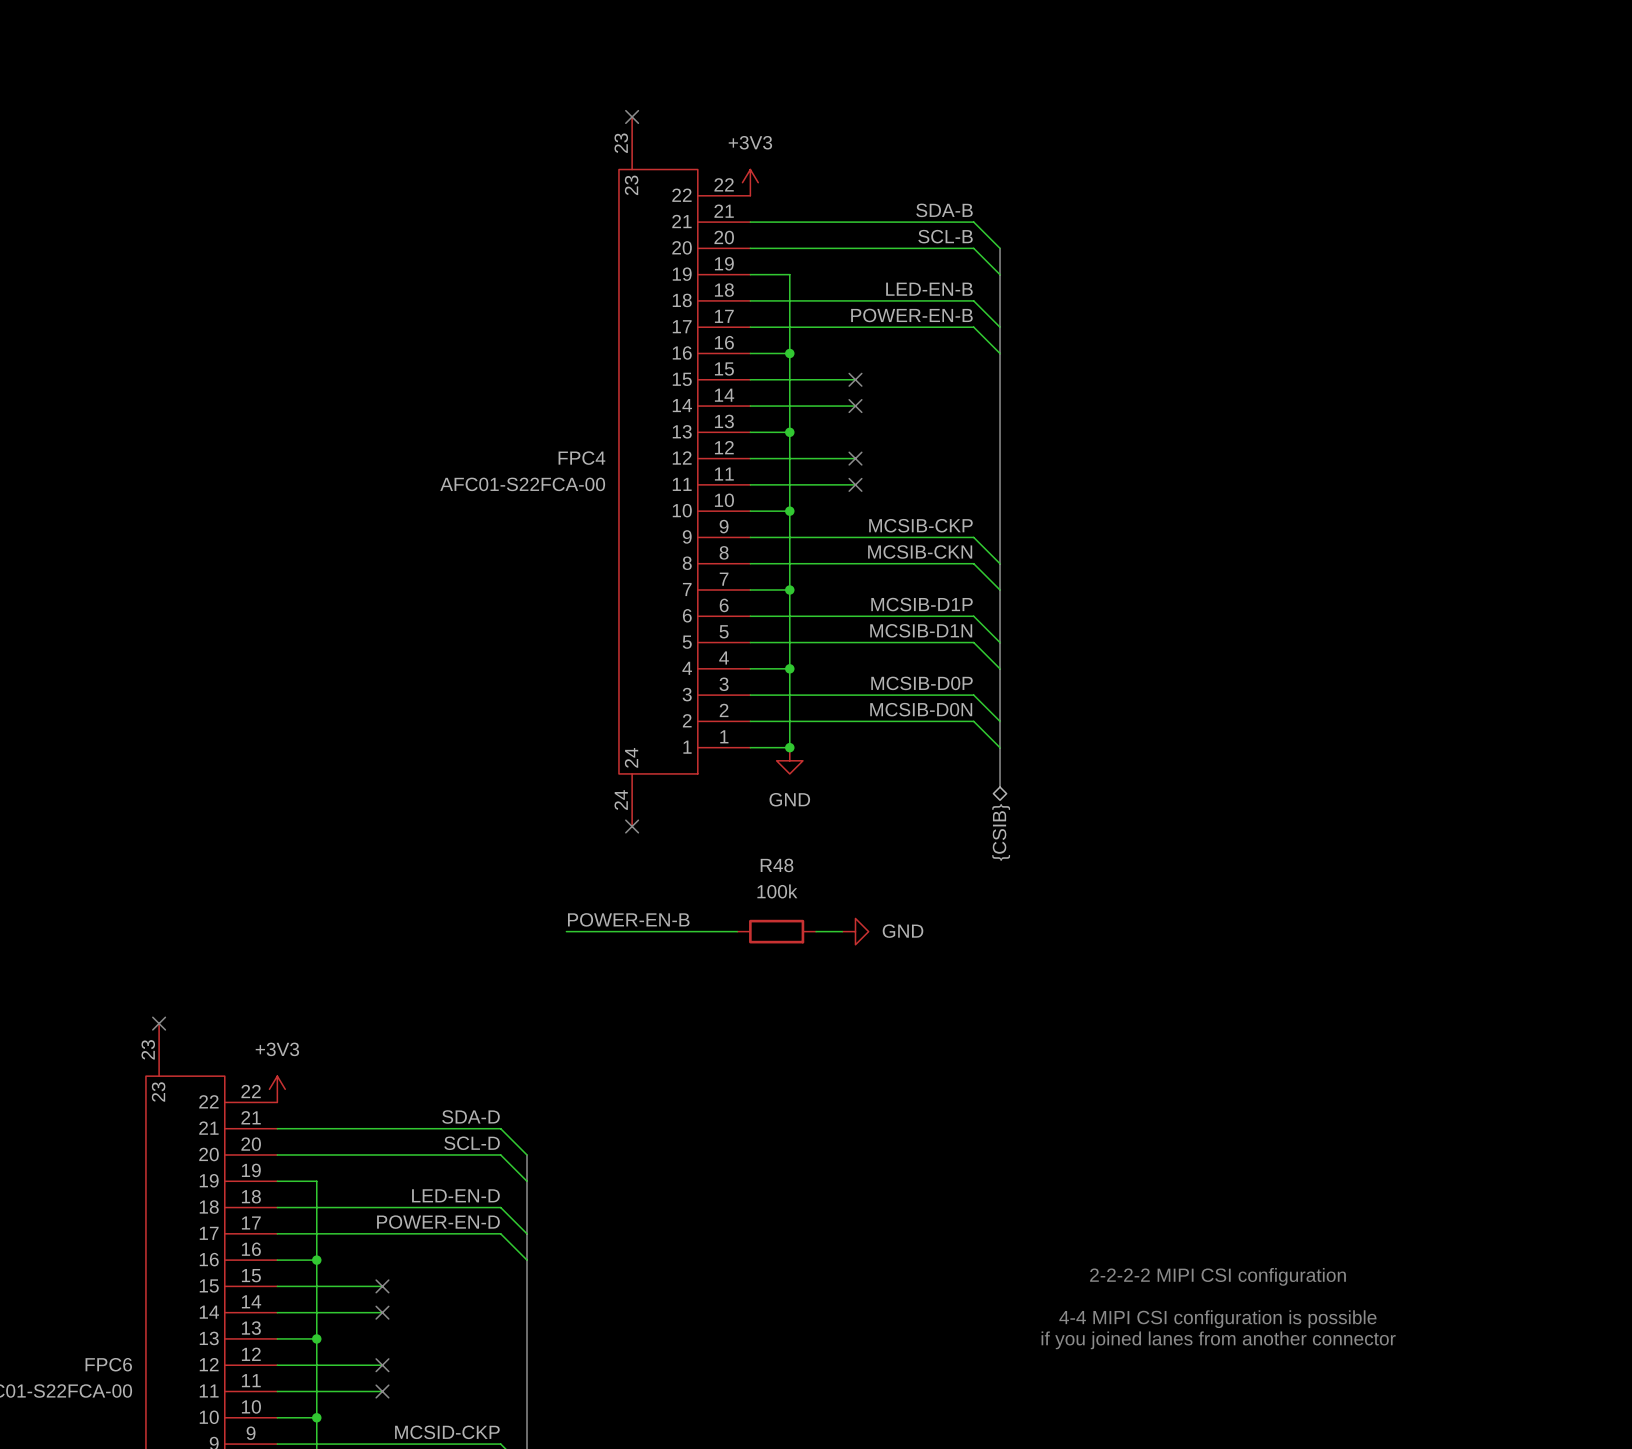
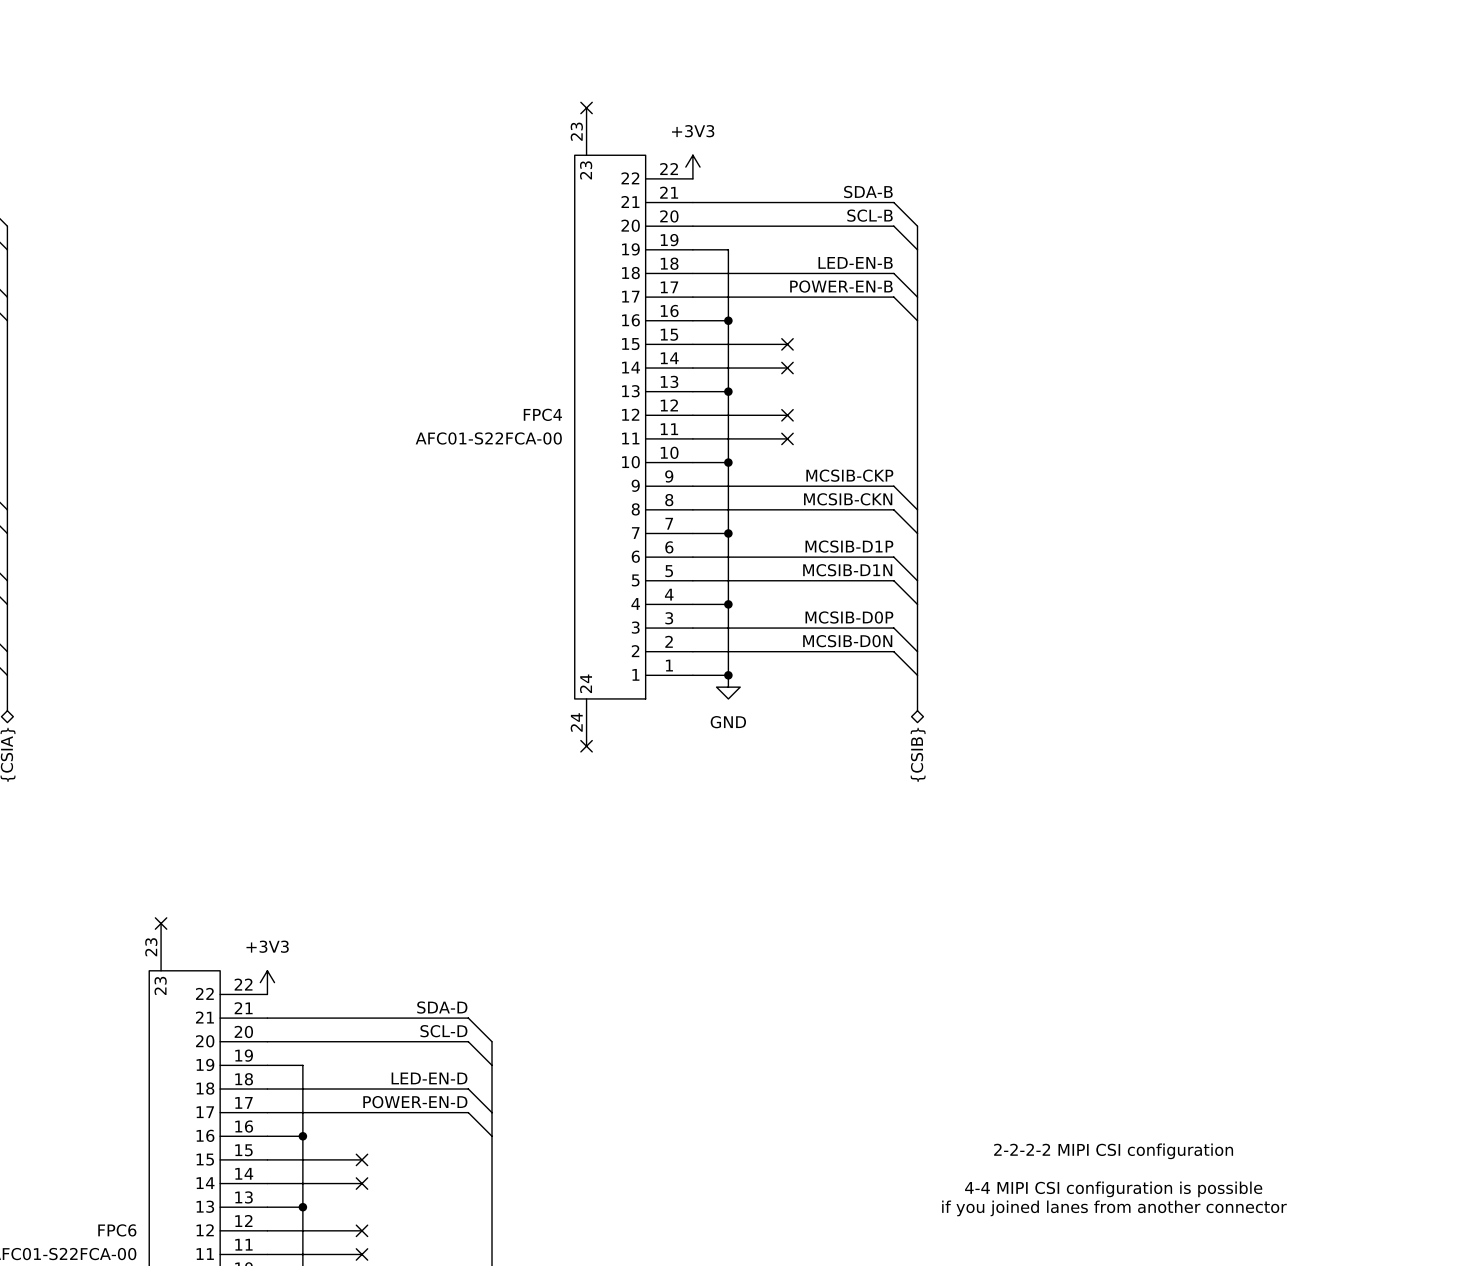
label: POWER-EN-B (628, 919) -> none
wire: (566, 931) (737, 931) -> none
R48: 100k (776, 931) -> none
wire: (816, 931) (842, 931) -> none
power symbol: GND (855, 931) -> none

